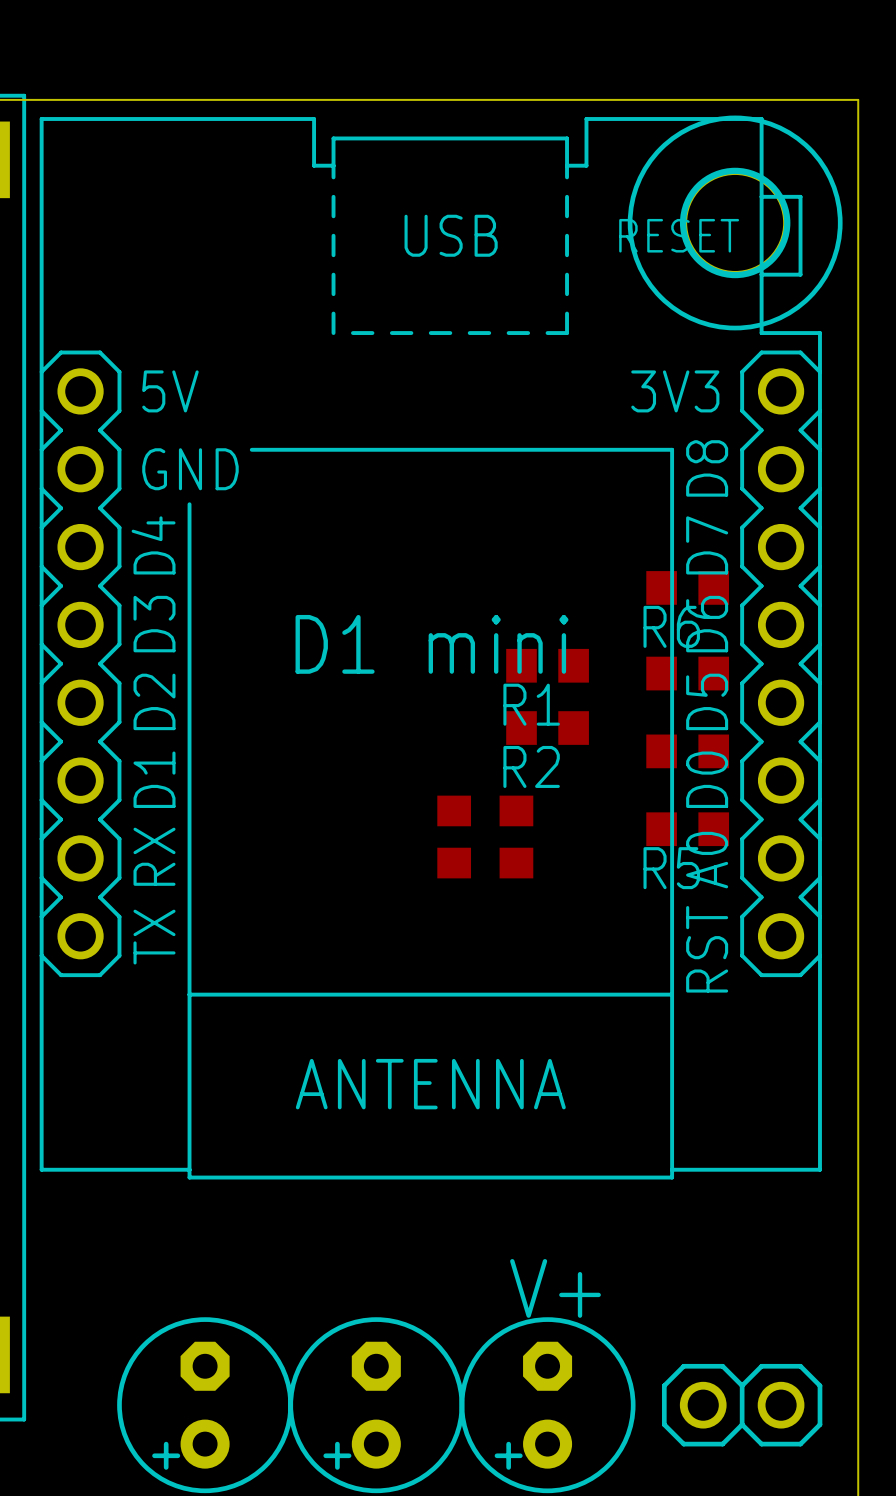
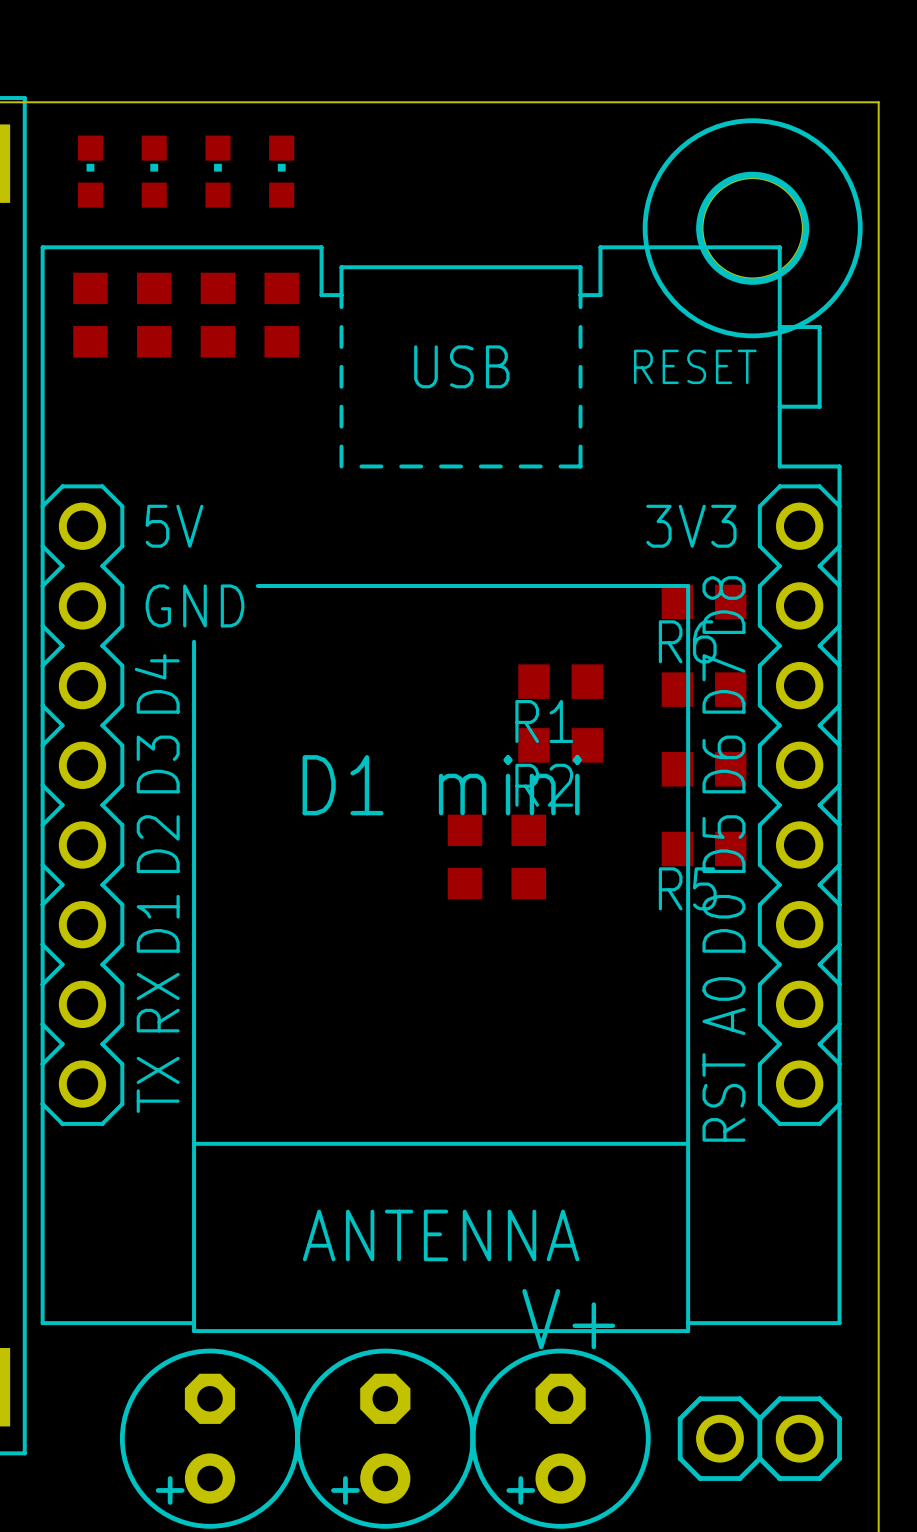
part: none -> (90, 171)
part: none -> (154, 171)
part: none -> (217, 171)
part: none -> (281, 171)
part: none -> (90, 315)
part: none -> (154, 315)
part: none -> (217, 315)
part: none -> (281, 315)
part position: (430, 648) -> (441, 789)

